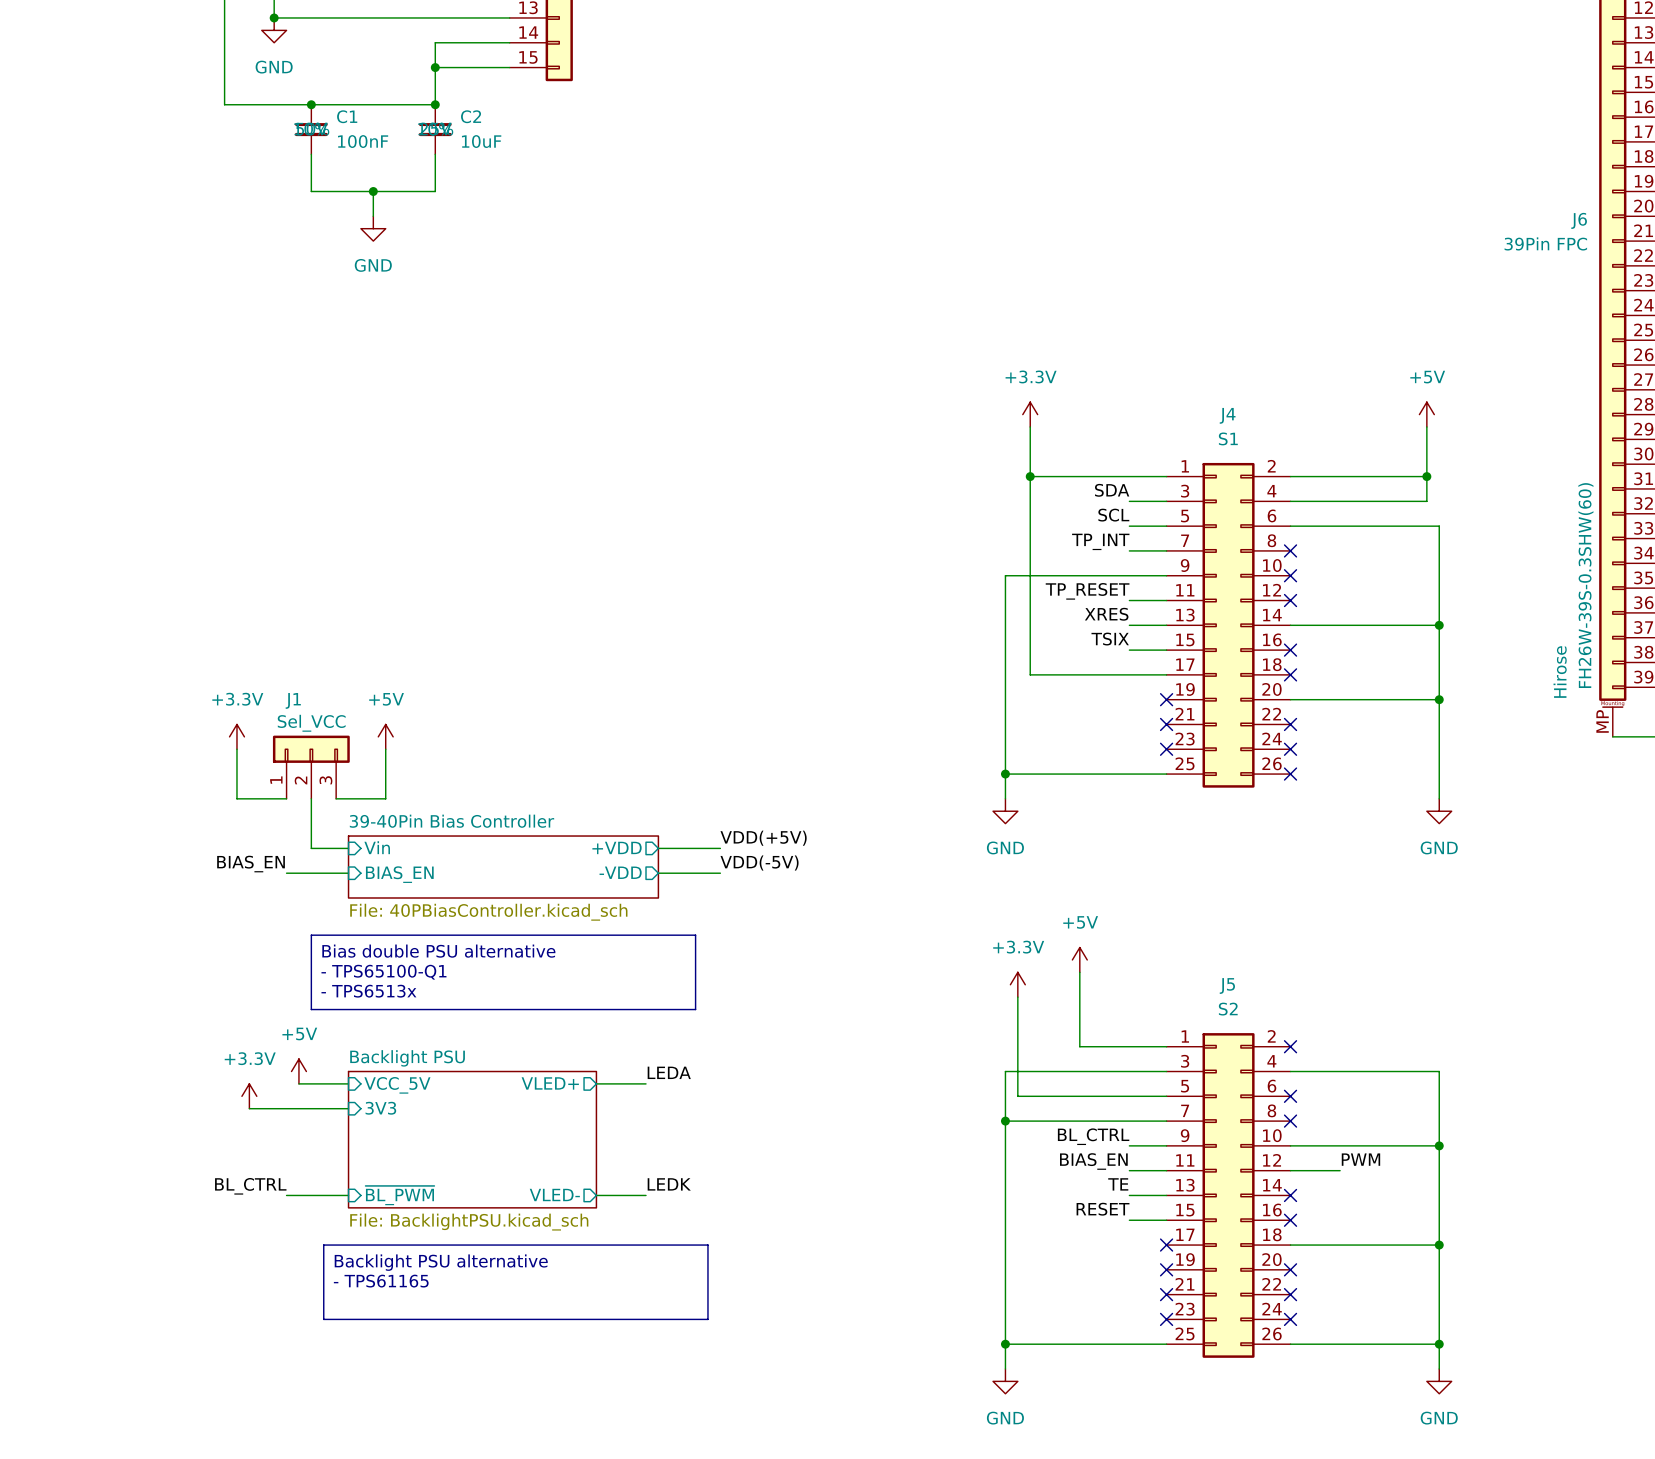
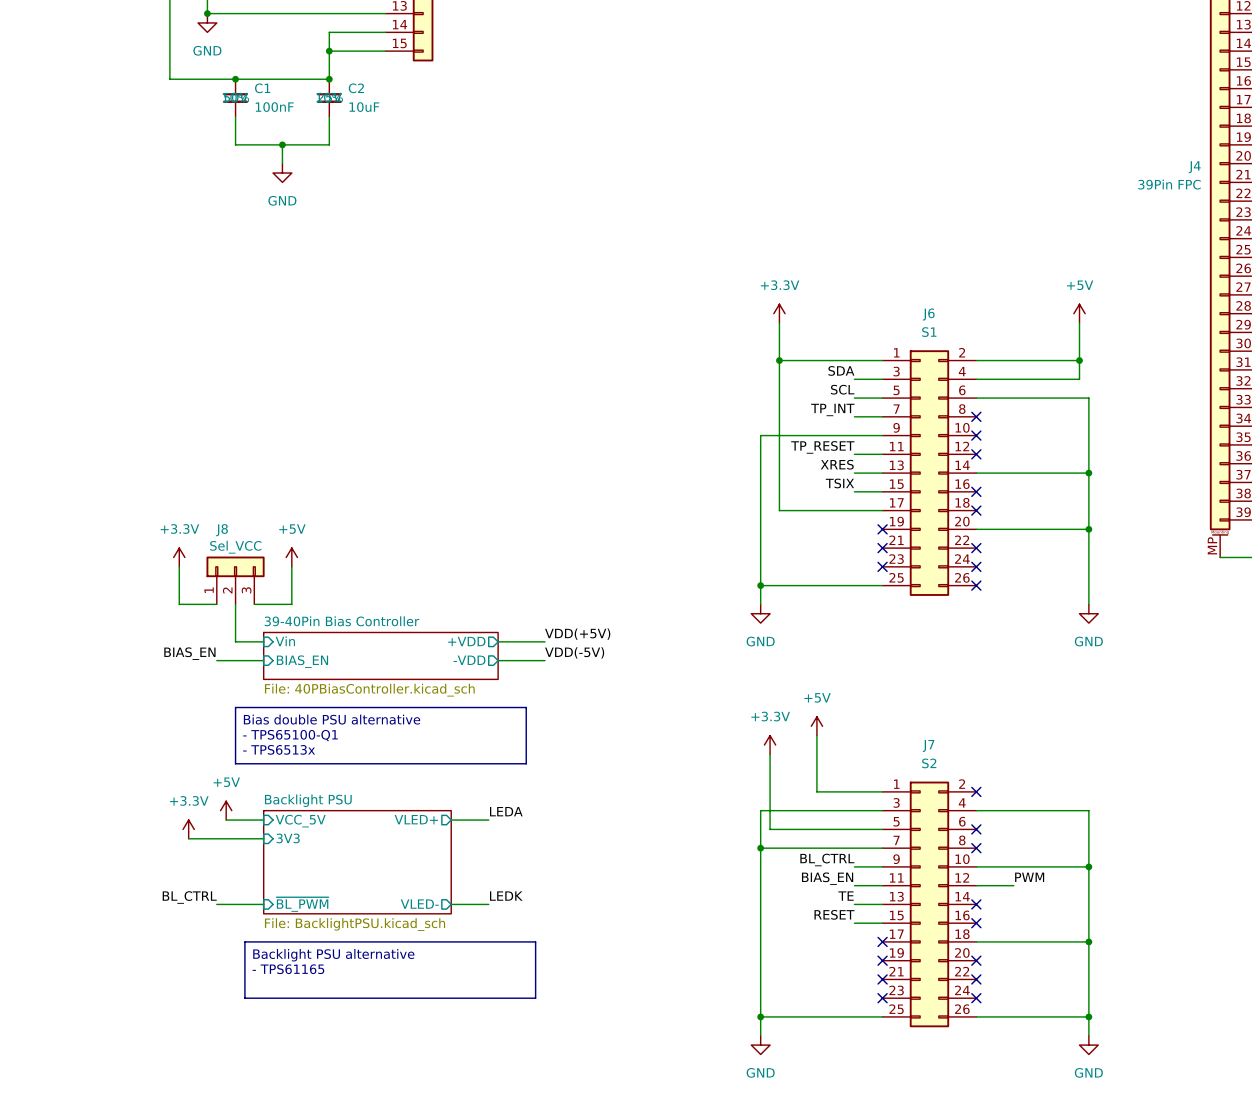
J6 name: J6 (1579, 220) -> J4 (1194, 167)
J4 name: J4 (1227, 415) -> J6 (928, 314)
J6 text: FH26W-39S-0.3SHW(60) (1585, 585) -> none
J6 text: Hirose (1560, 672) -> none
J1 name: J1 (293, 700) -> J8 (222, 530)
J5 name: J5 (1227, 985) -> J7 (928, 745)

